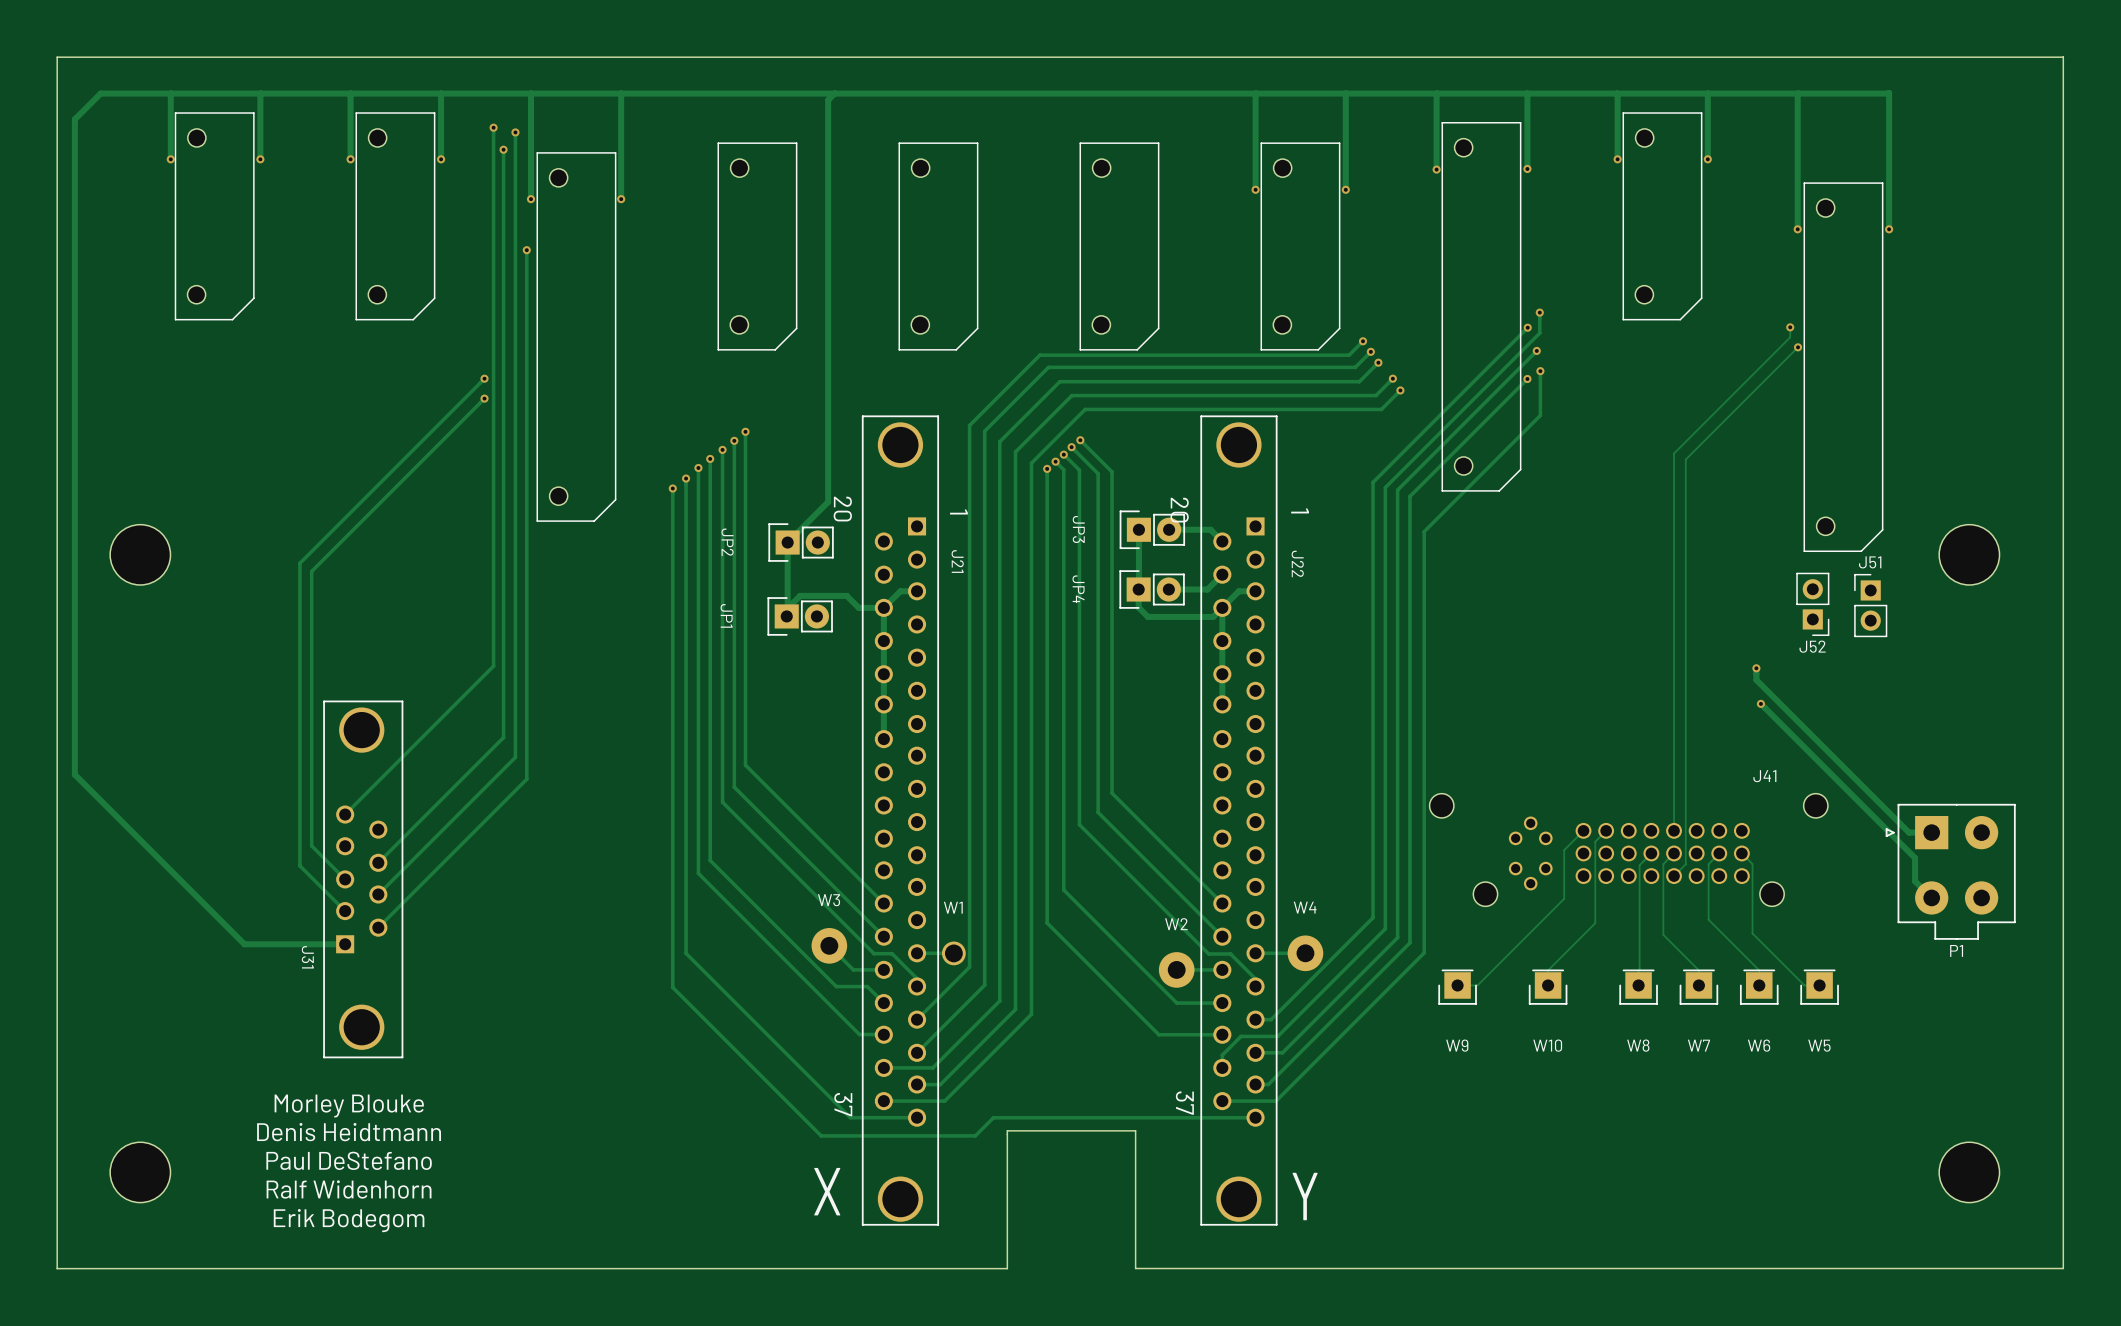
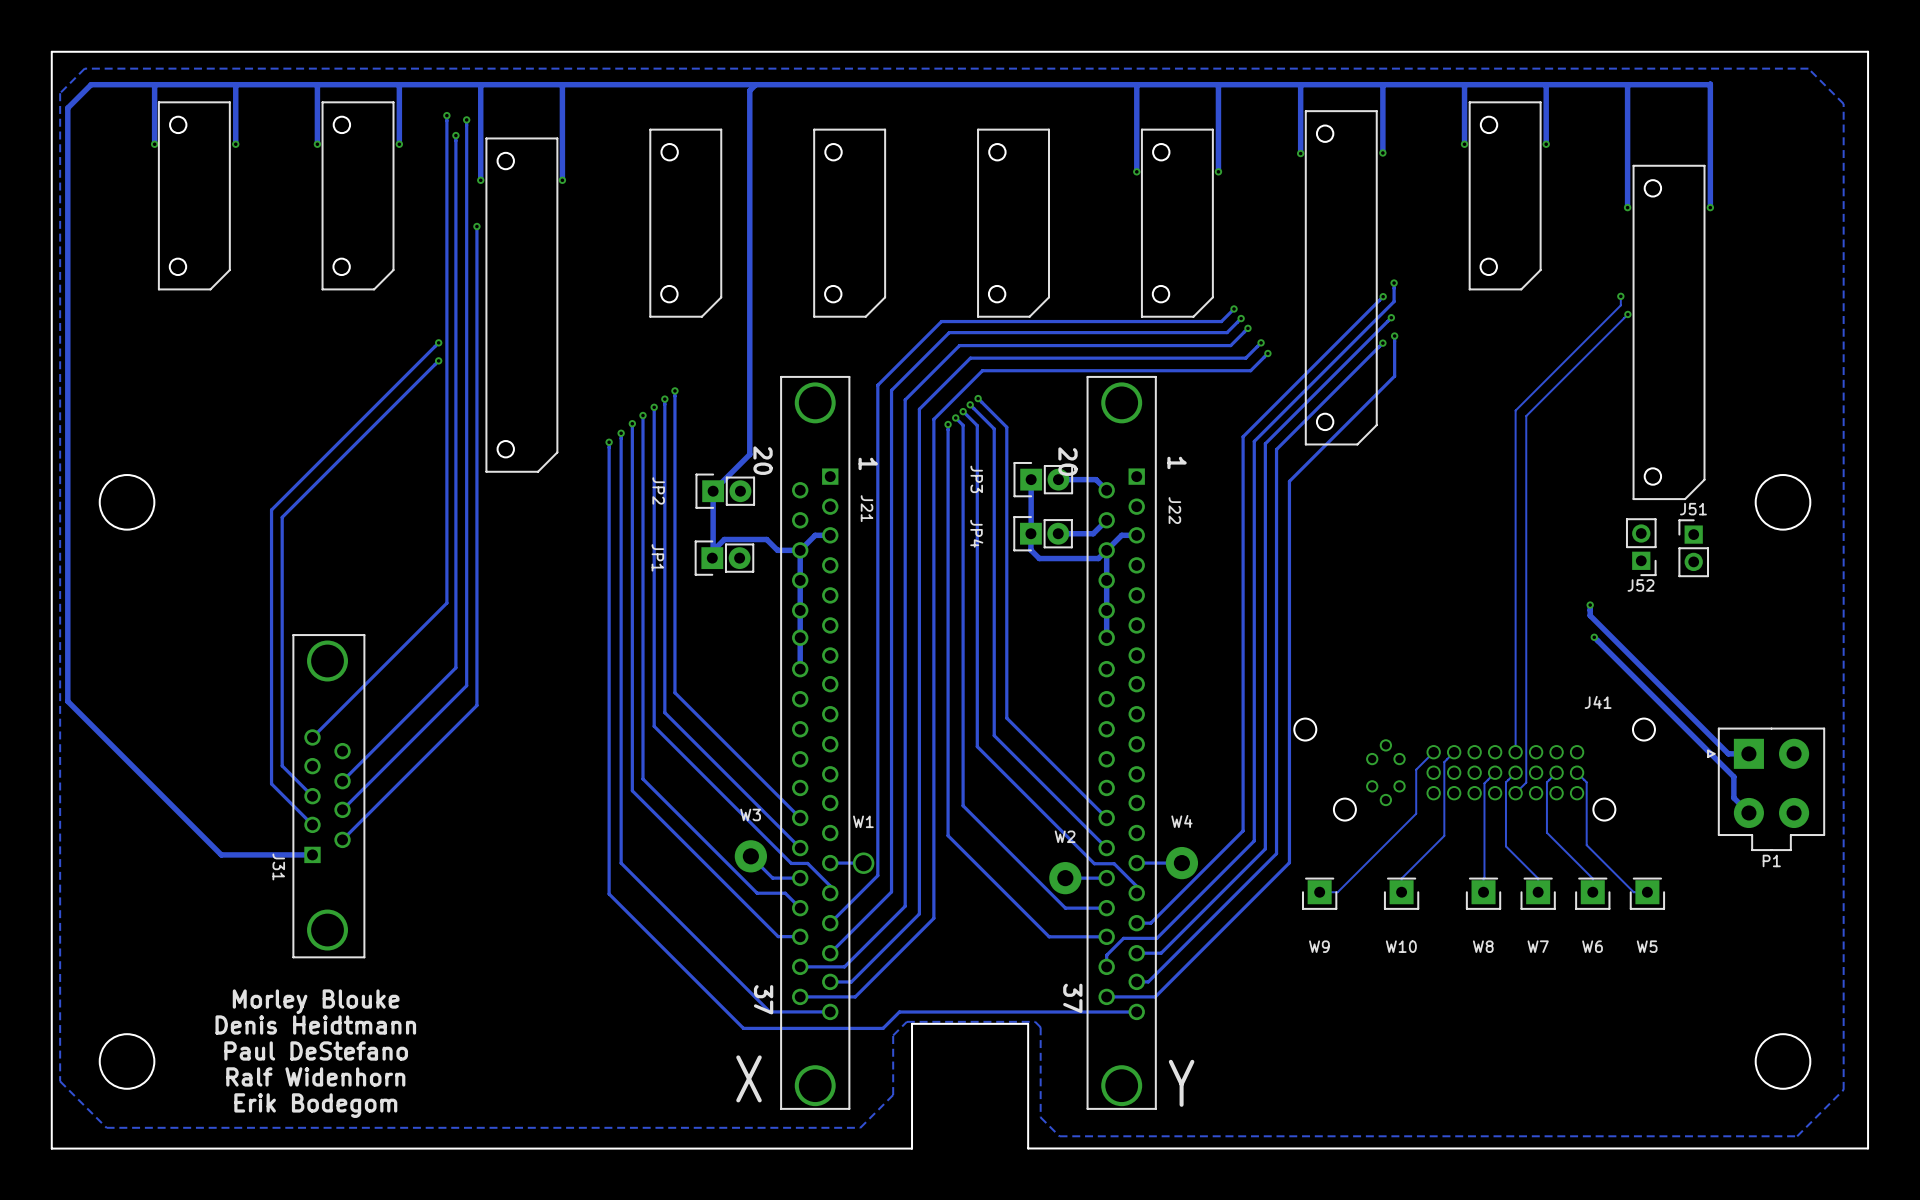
zone outline: none -> (1808, 68) (84, 68) (60, 93) (60, 1081) (106, 1127) (860, 1127) (893, 1095) (893, 1035) (906, 1021) (1035, 1021) (1040, 1027) (1040, 1117) (1059, 1136) (1797, 1136) (1843, 1089) (1843, 103) (1808, 68)

